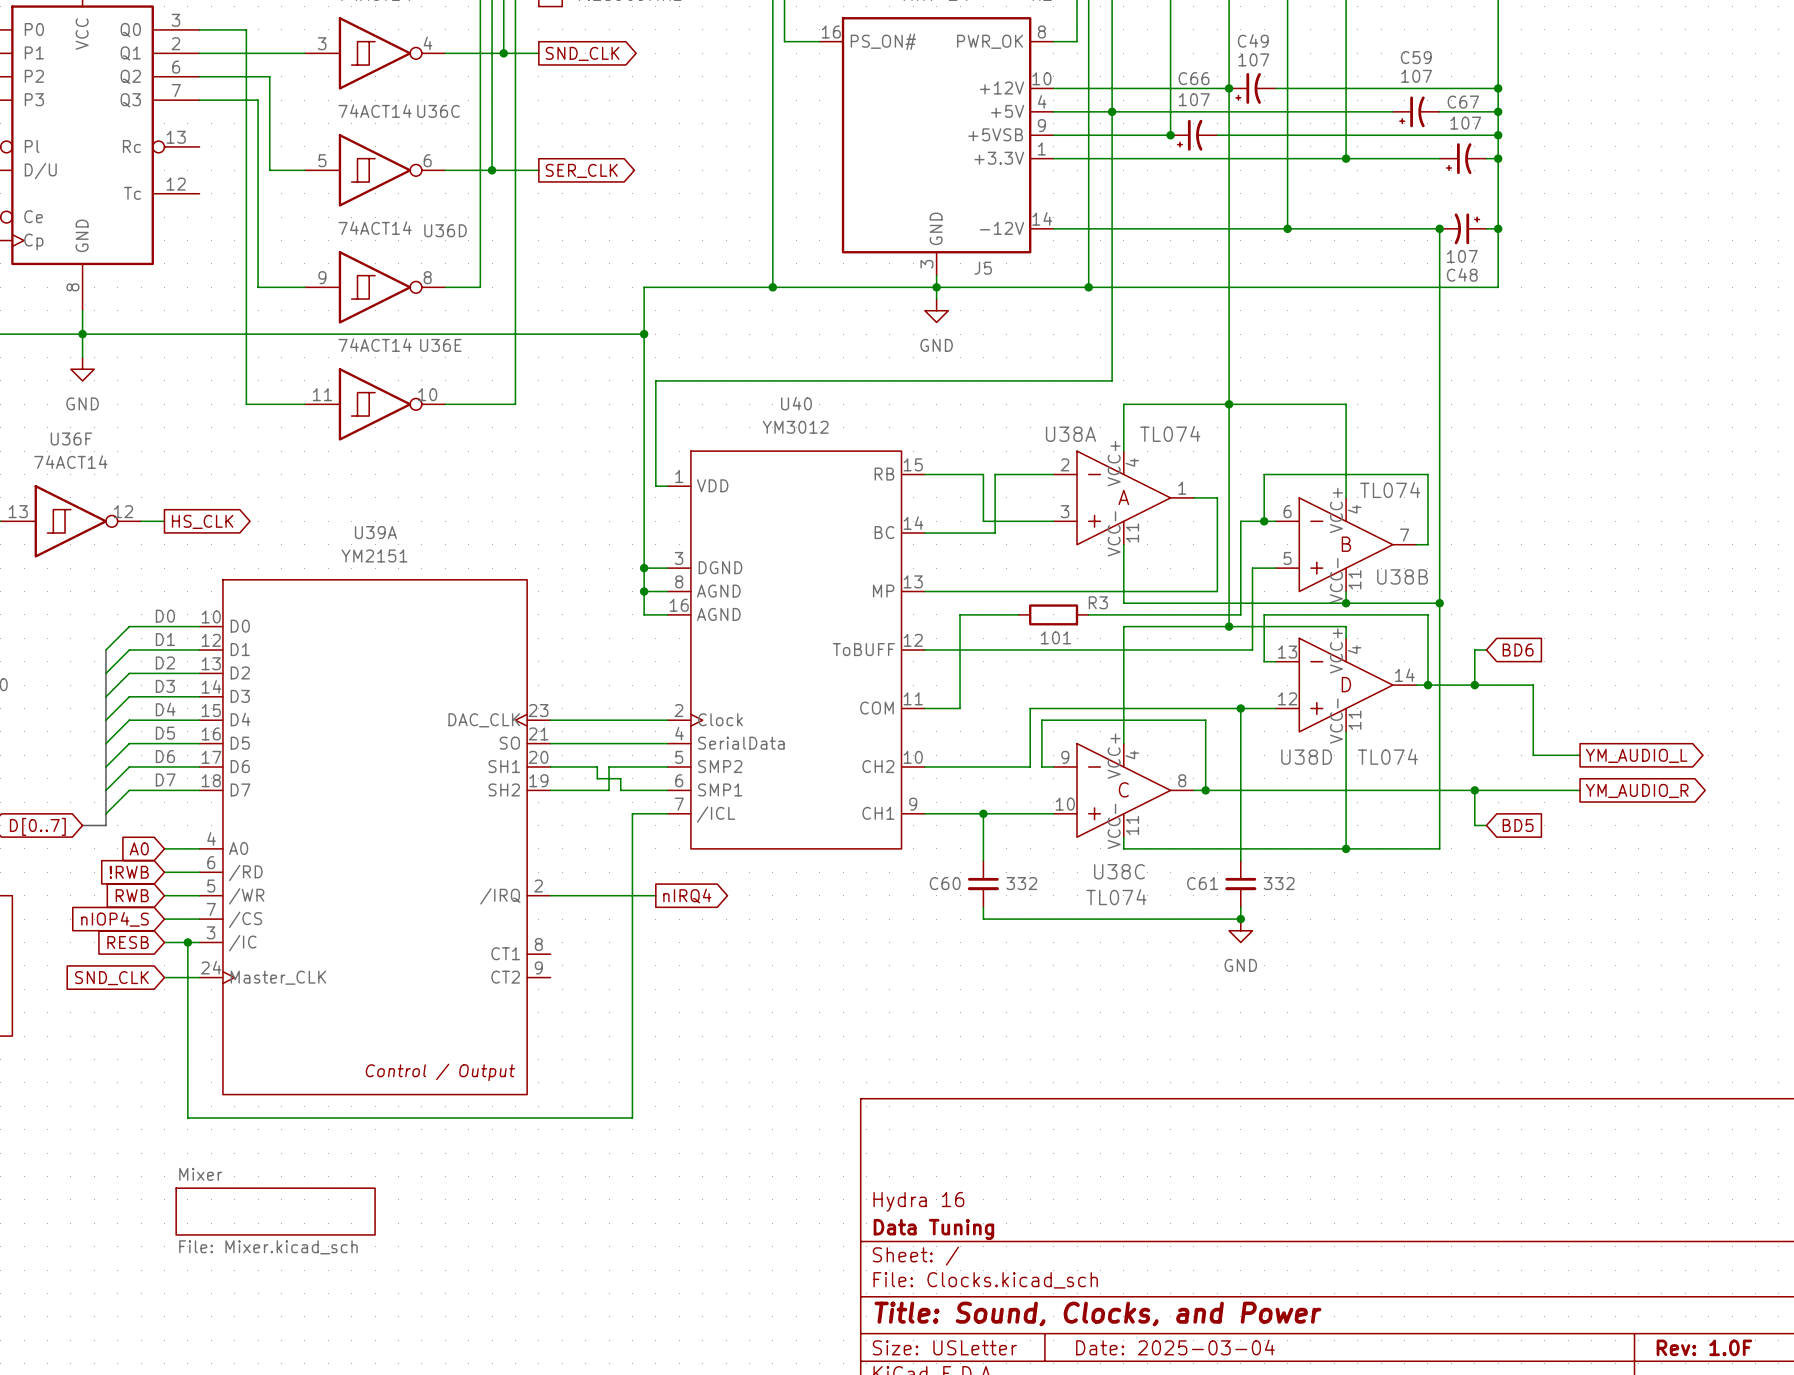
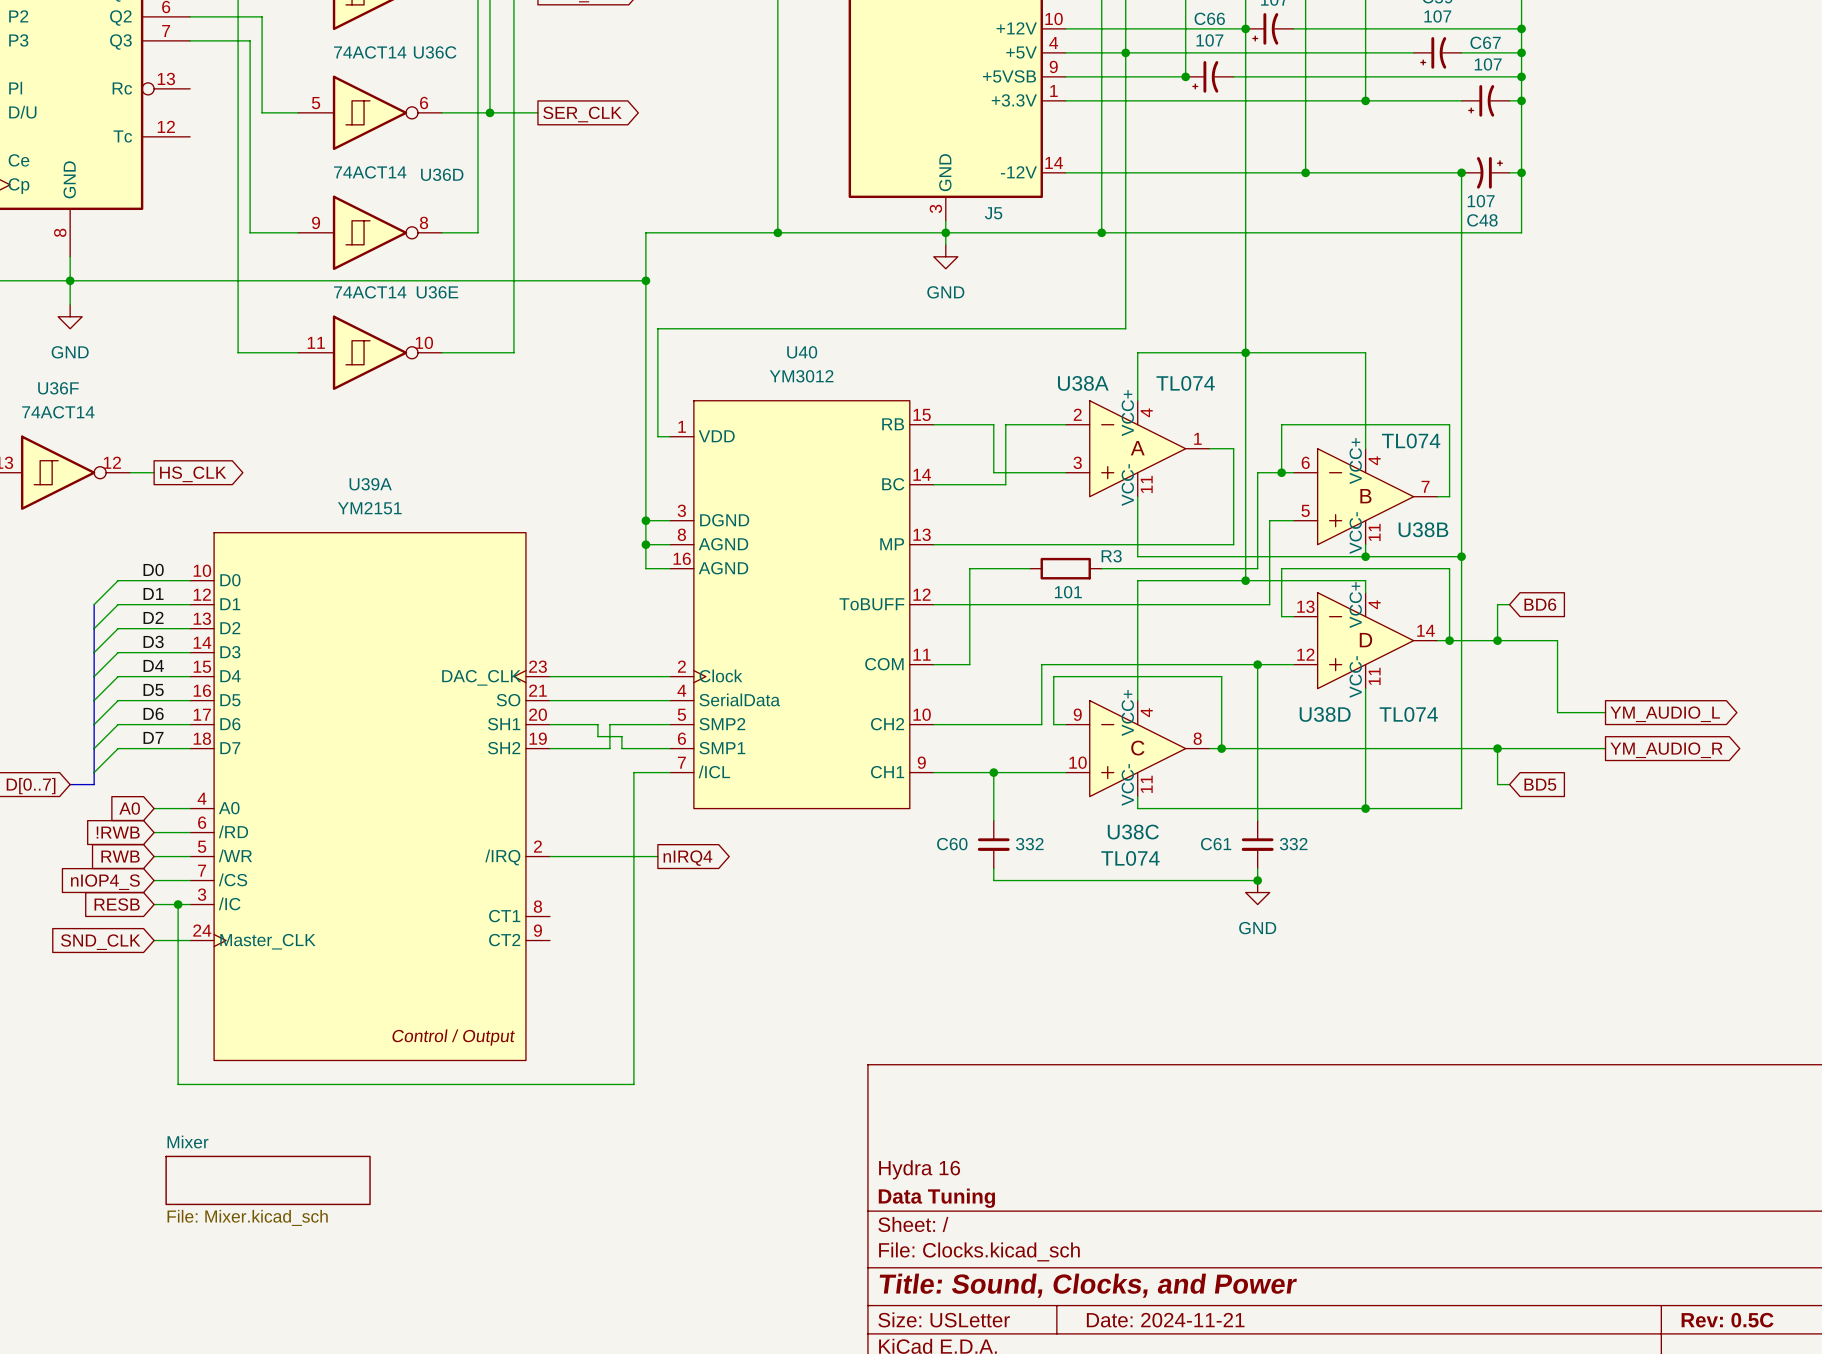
title block: Date: 2025-03-04 (1175, 1347) -> Date: 2024-11-21 (1165, 1320)
title block: Rev: 1.0F (1704, 1347) -> Rev: 0.5C (1727, 1320)

